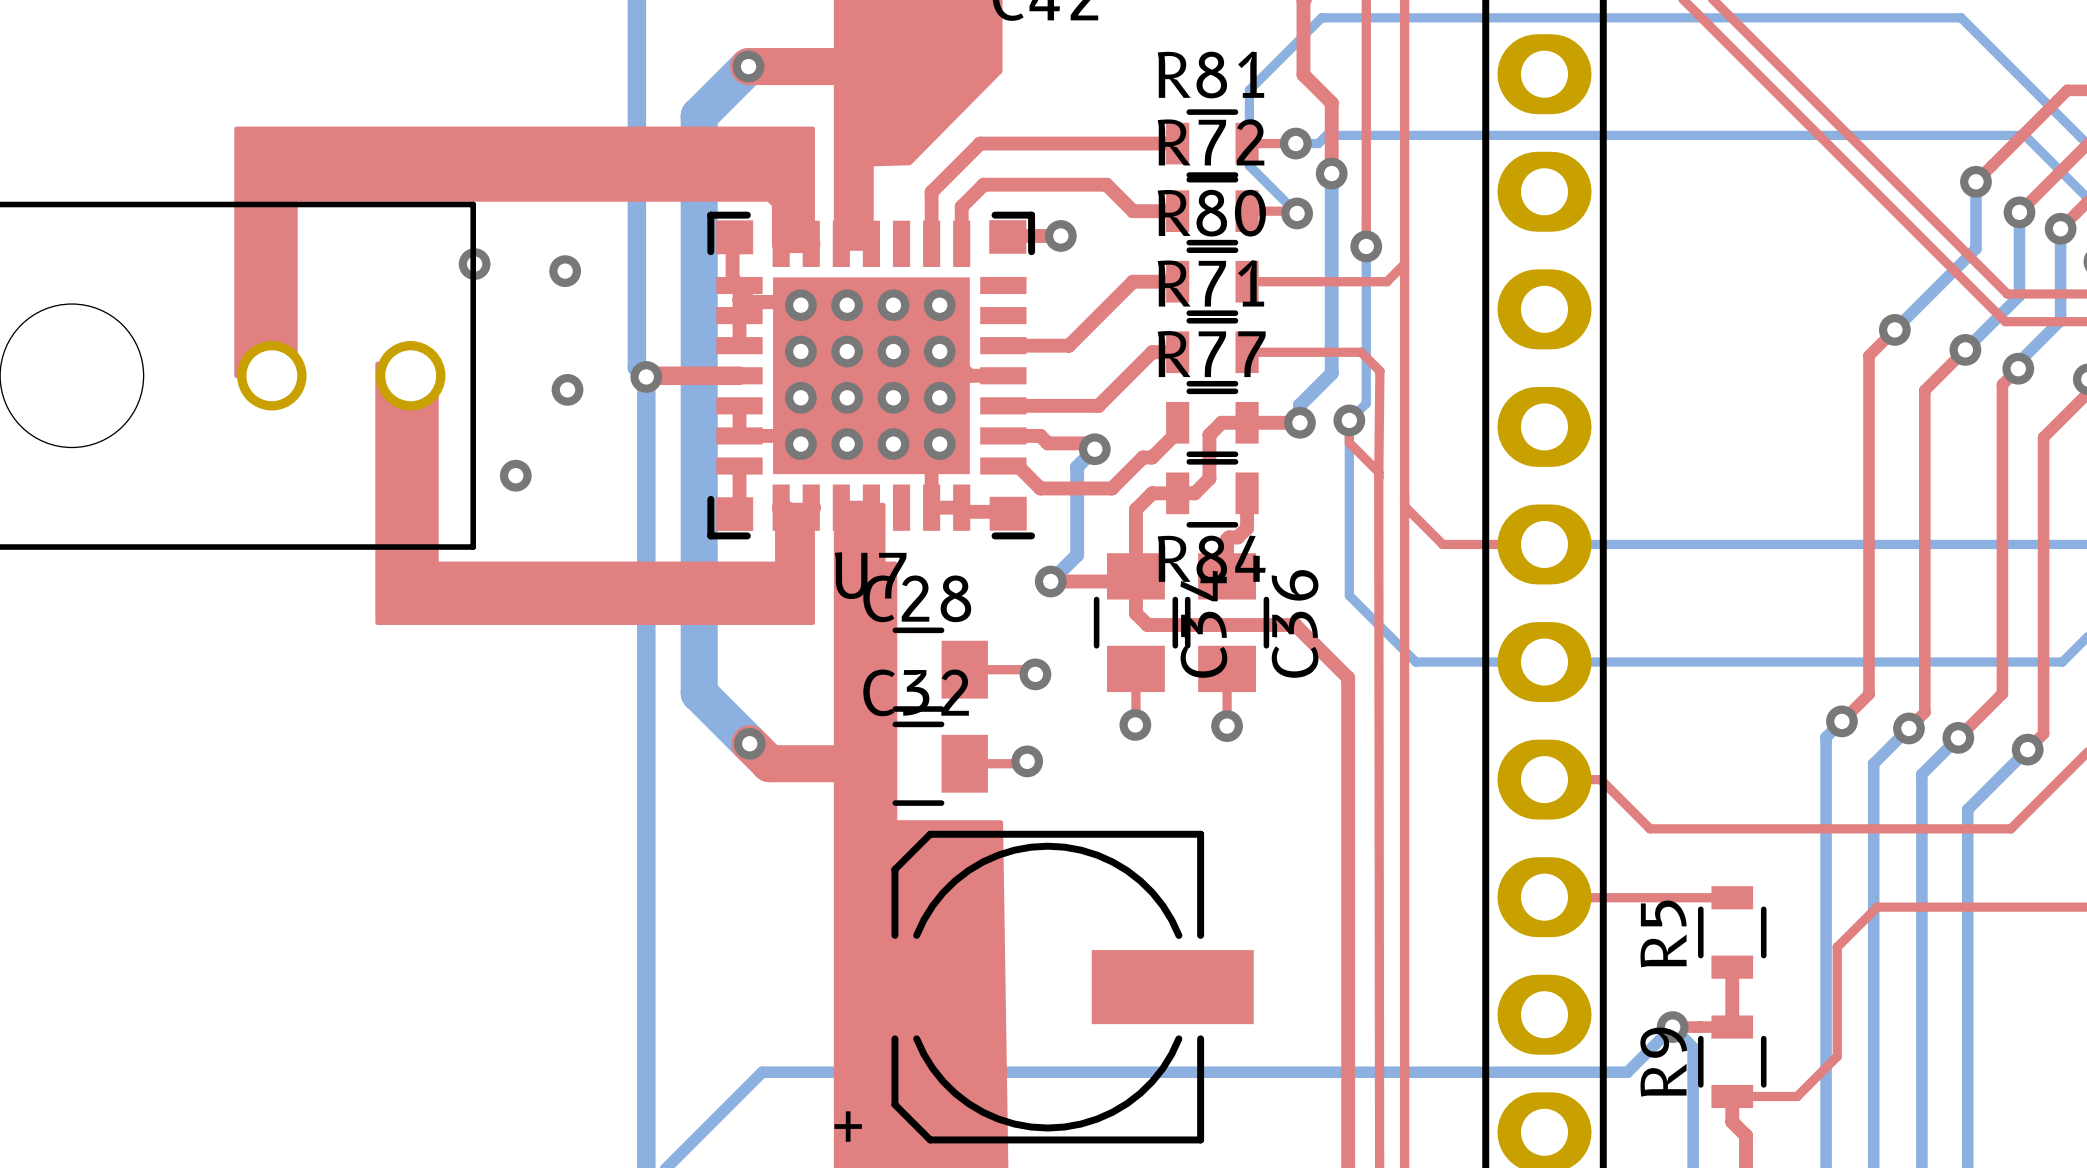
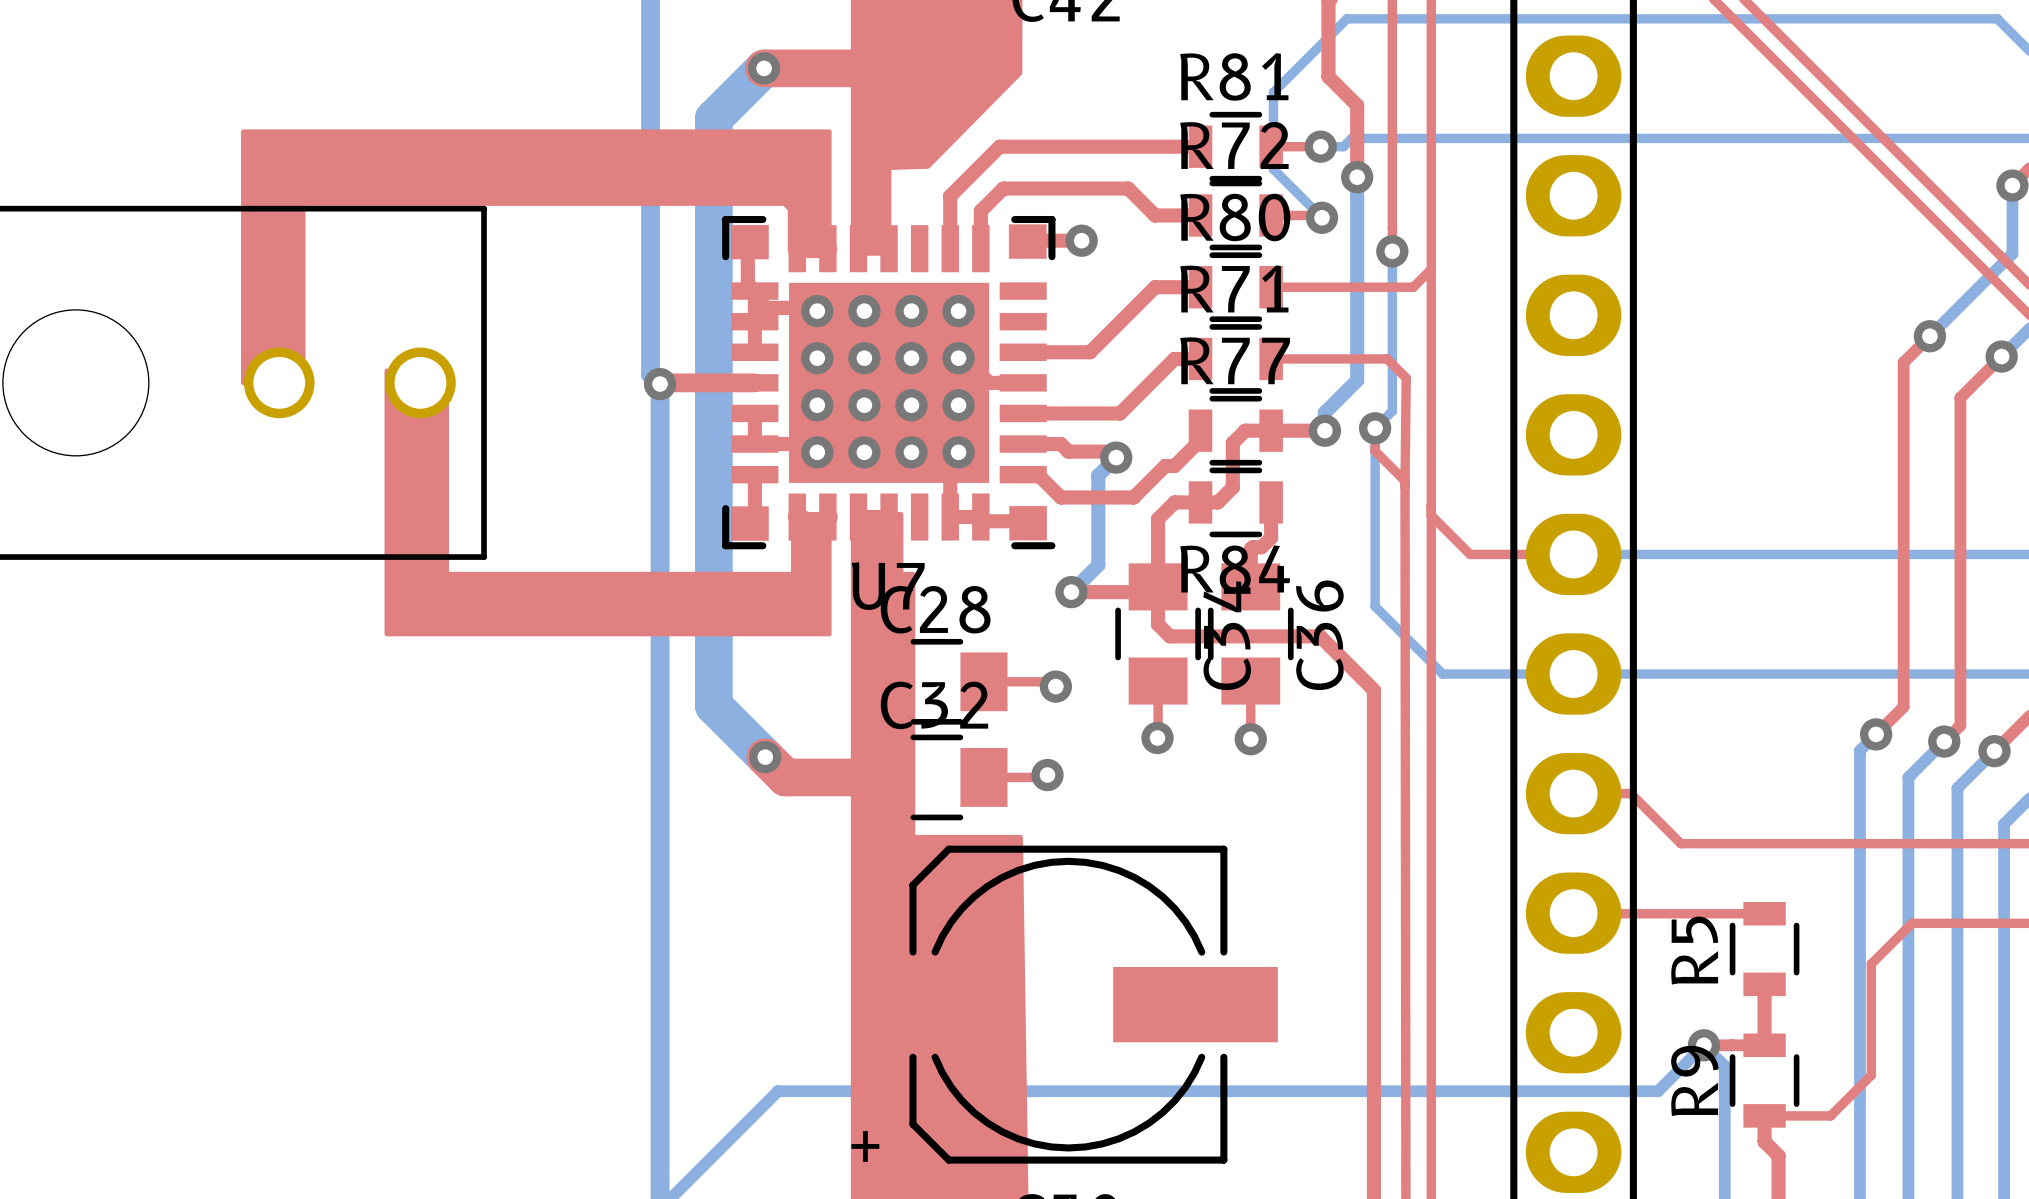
via: (474, 264) -> none
via: (565, 271) -> none
via: (567, 389) -> none
via: (515, 475) -> none

